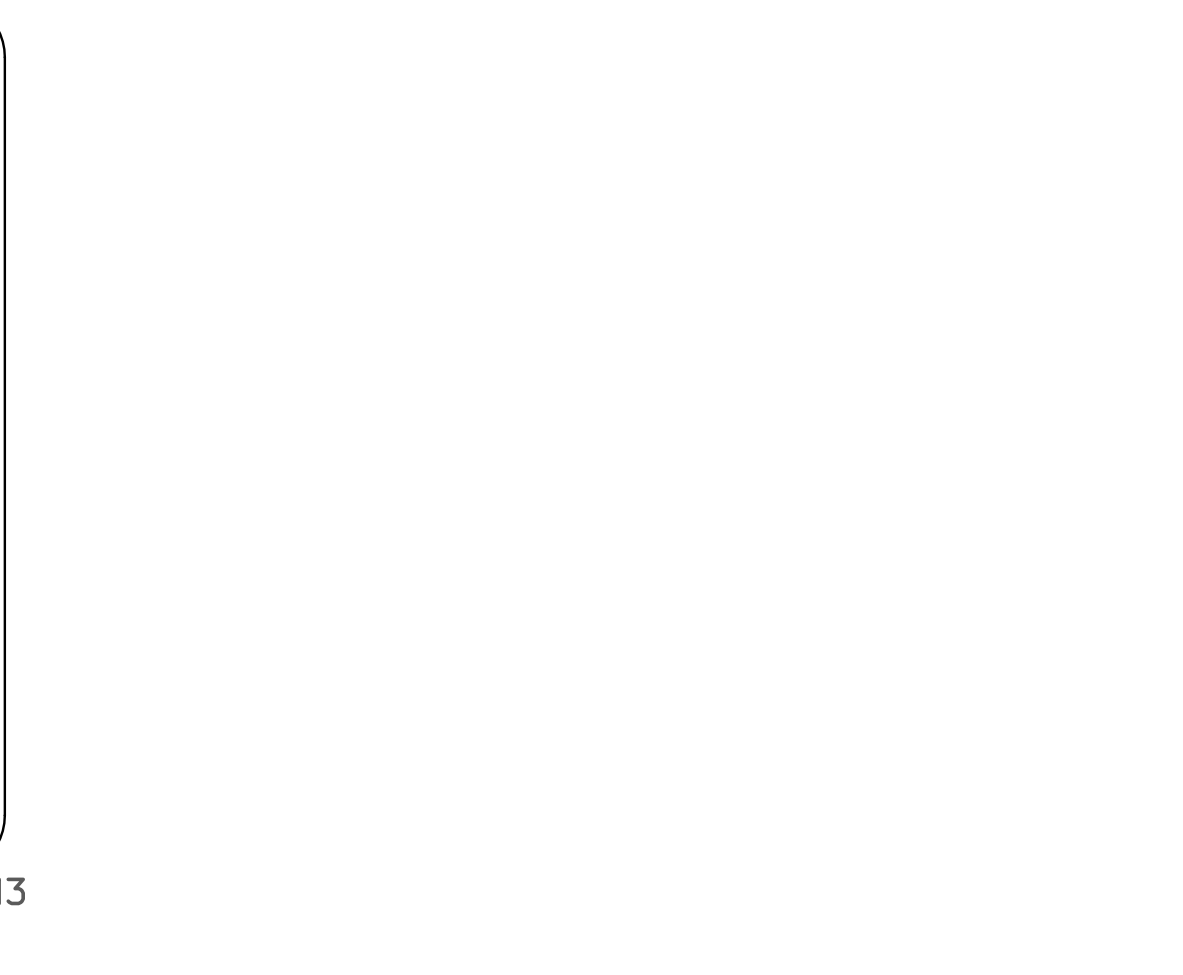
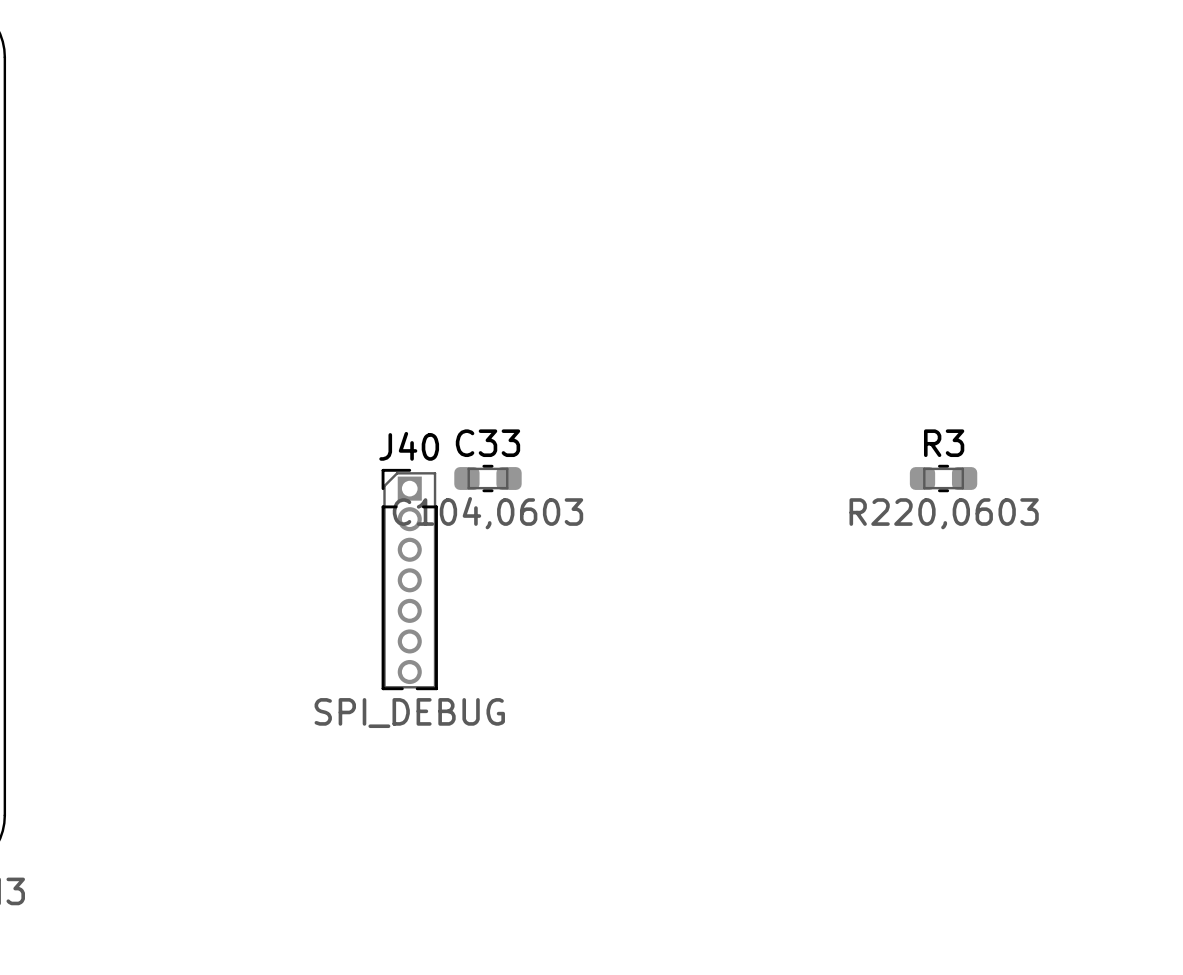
C33: none -> C104,0603 (487, 478)
R3: none -> R220,0603 (943, 478)
J40: none -> SPI_DEBUG (409, 579)

